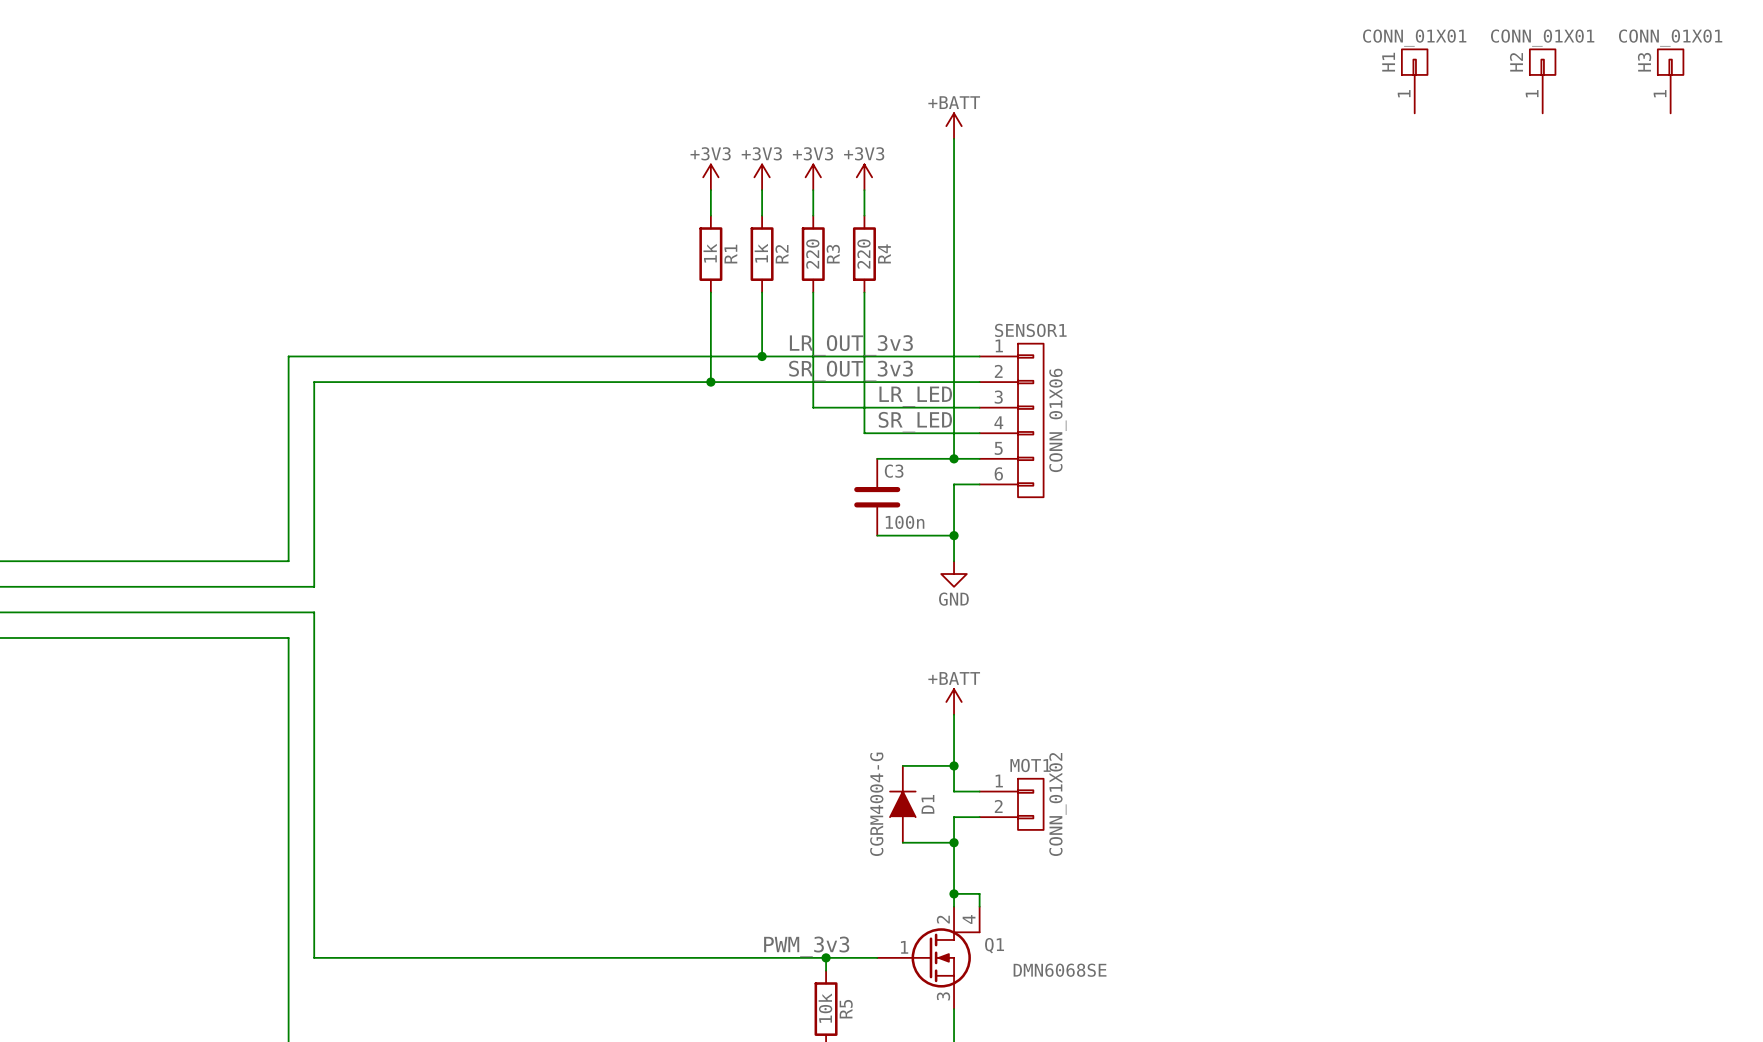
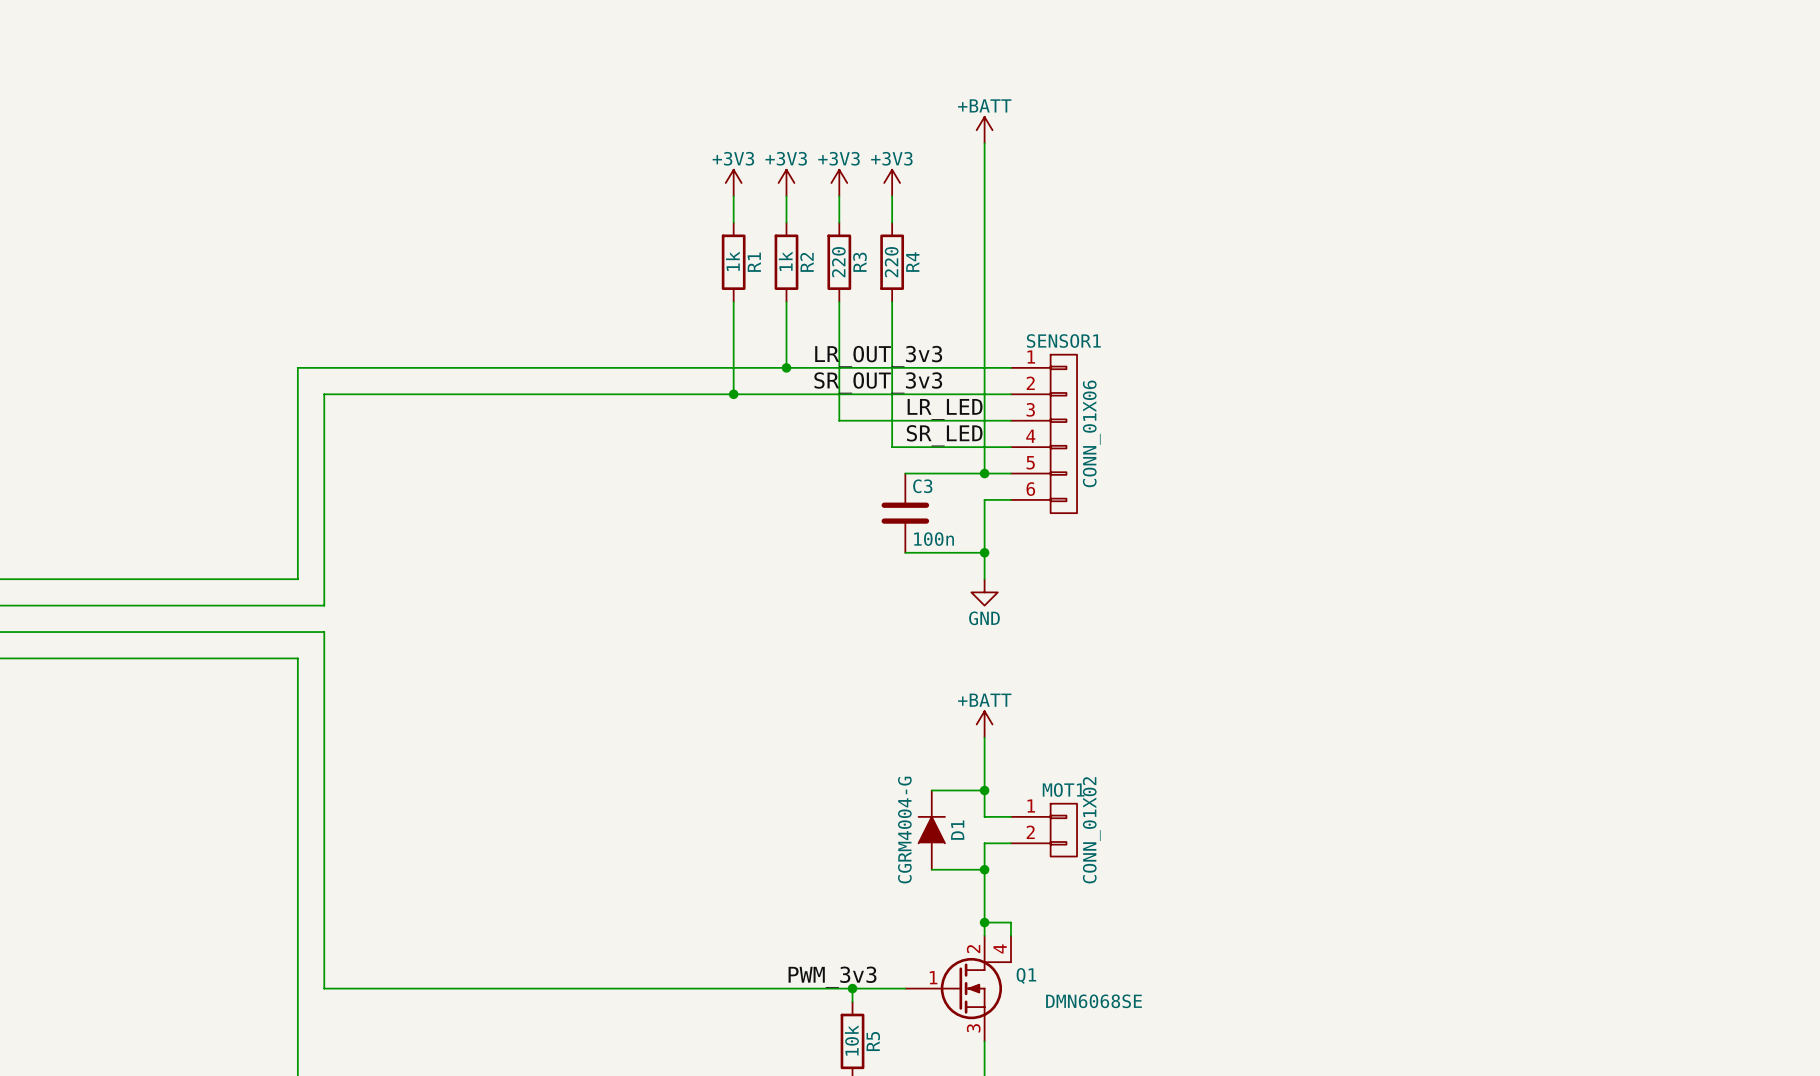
H1: CONN_01X01 (1414, 81) -> none
H2: CONN_01X01 (1542, 81) -> none
H3: CONN_01X01 (1670, 81) -> none

